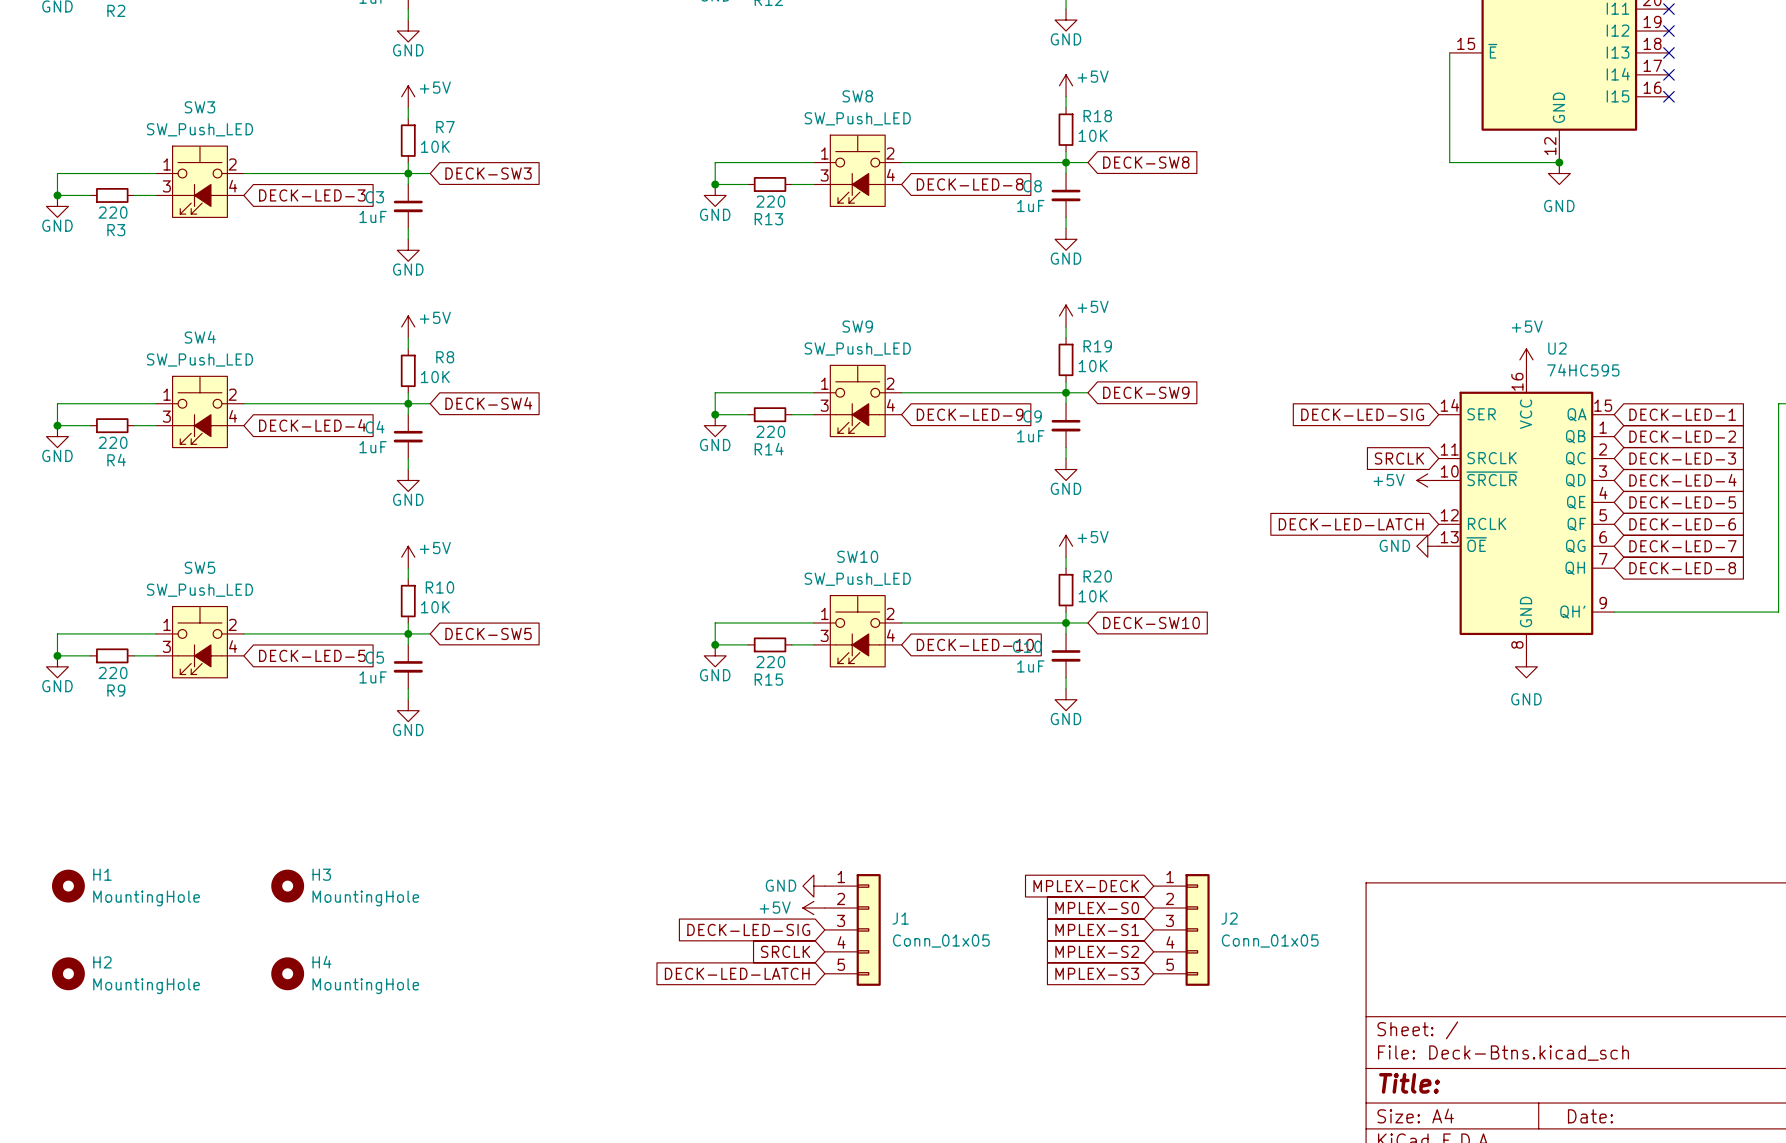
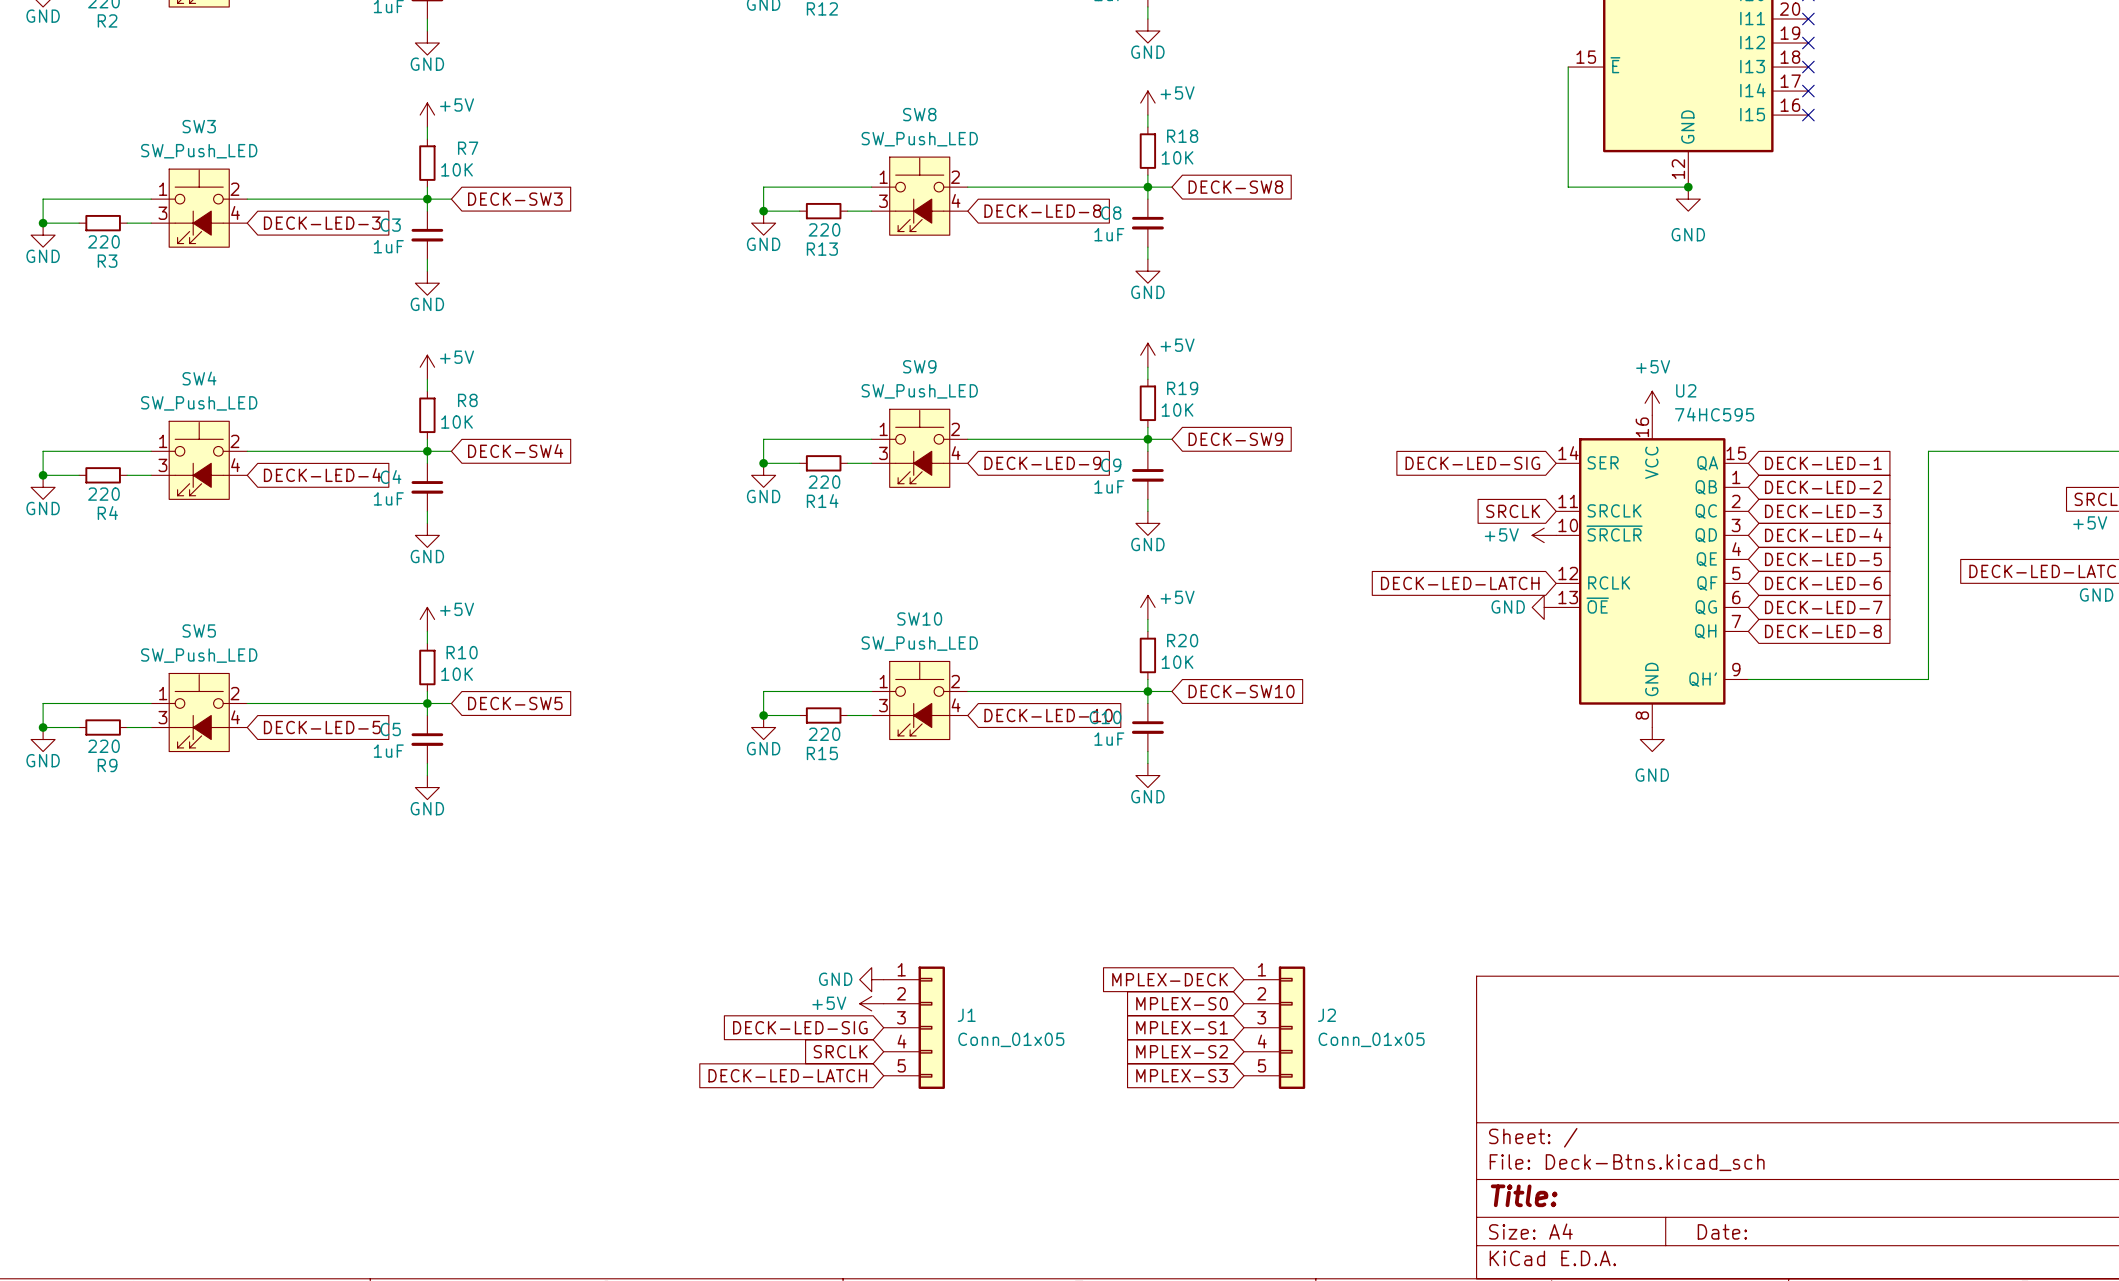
H1: MountingHole (68, 886) -> none
H3: MountingHole (287, 886) -> none
H2: MountingHole (68, 973) -> none
H4: MountingHole (287, 973) -> none

